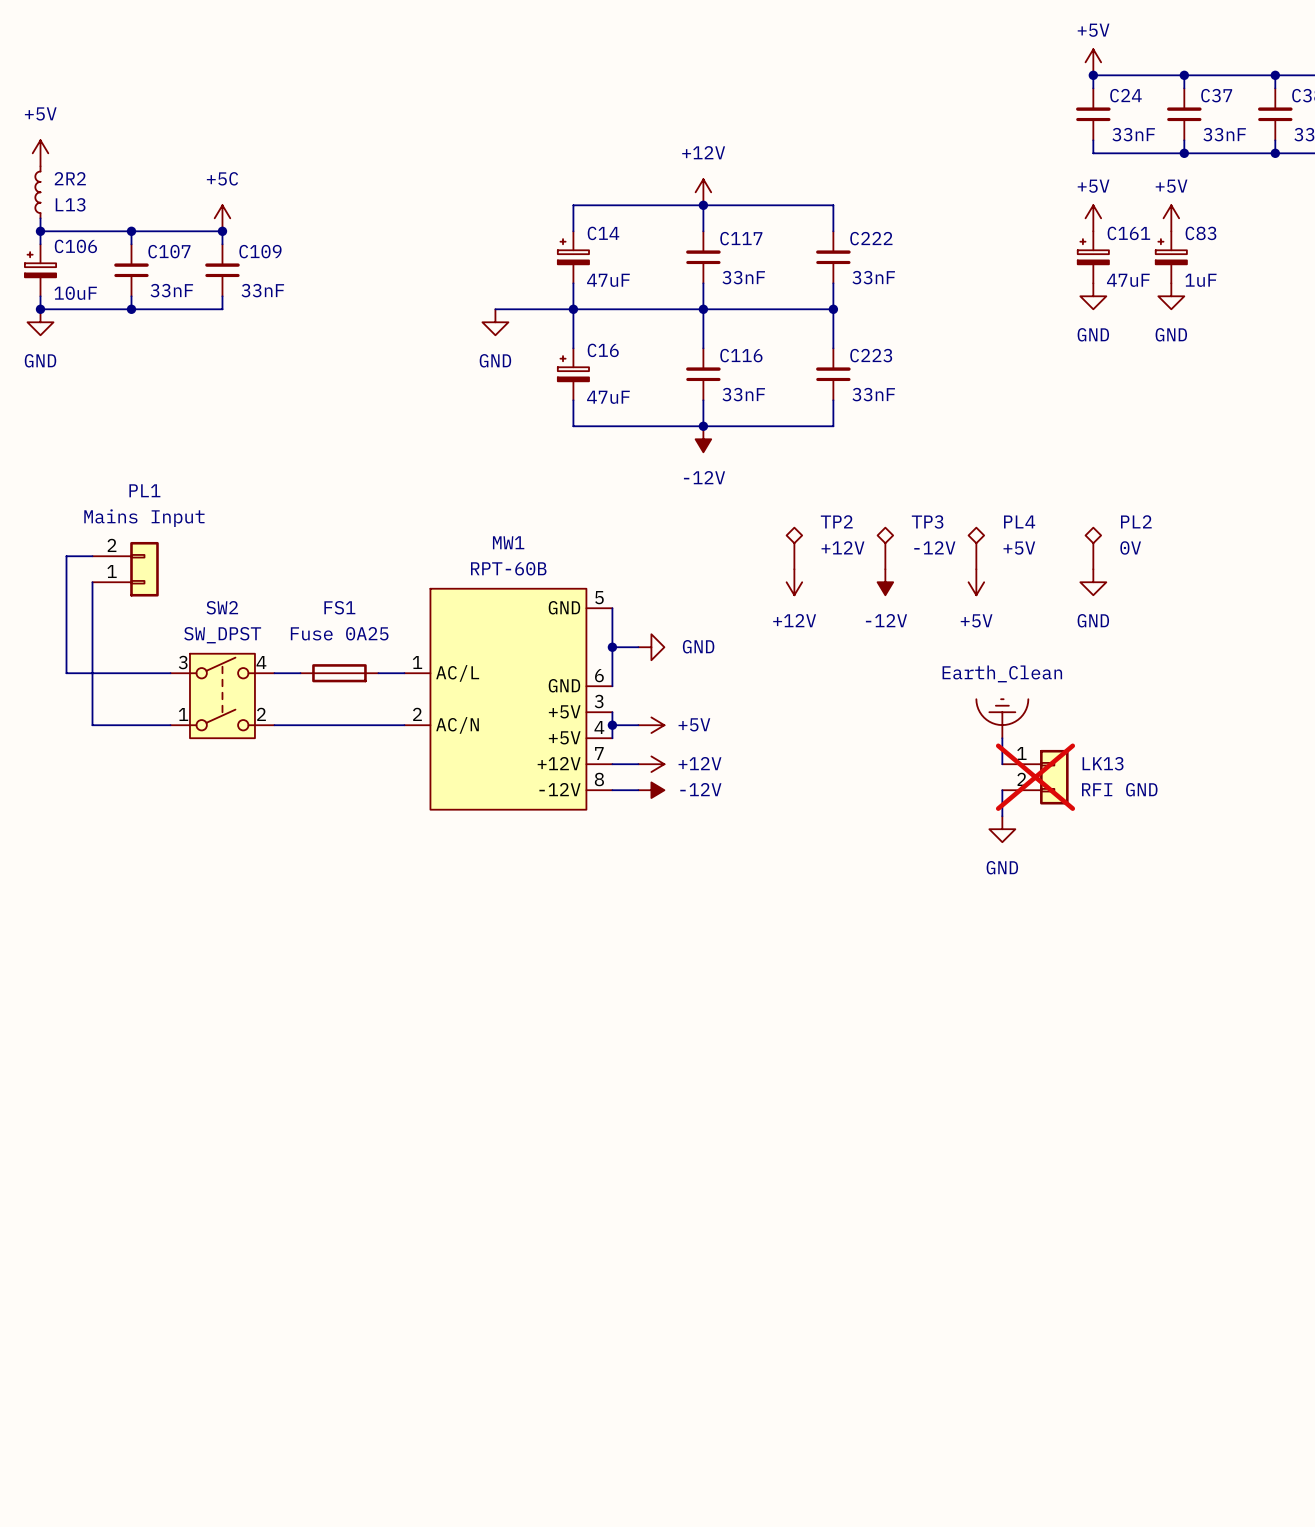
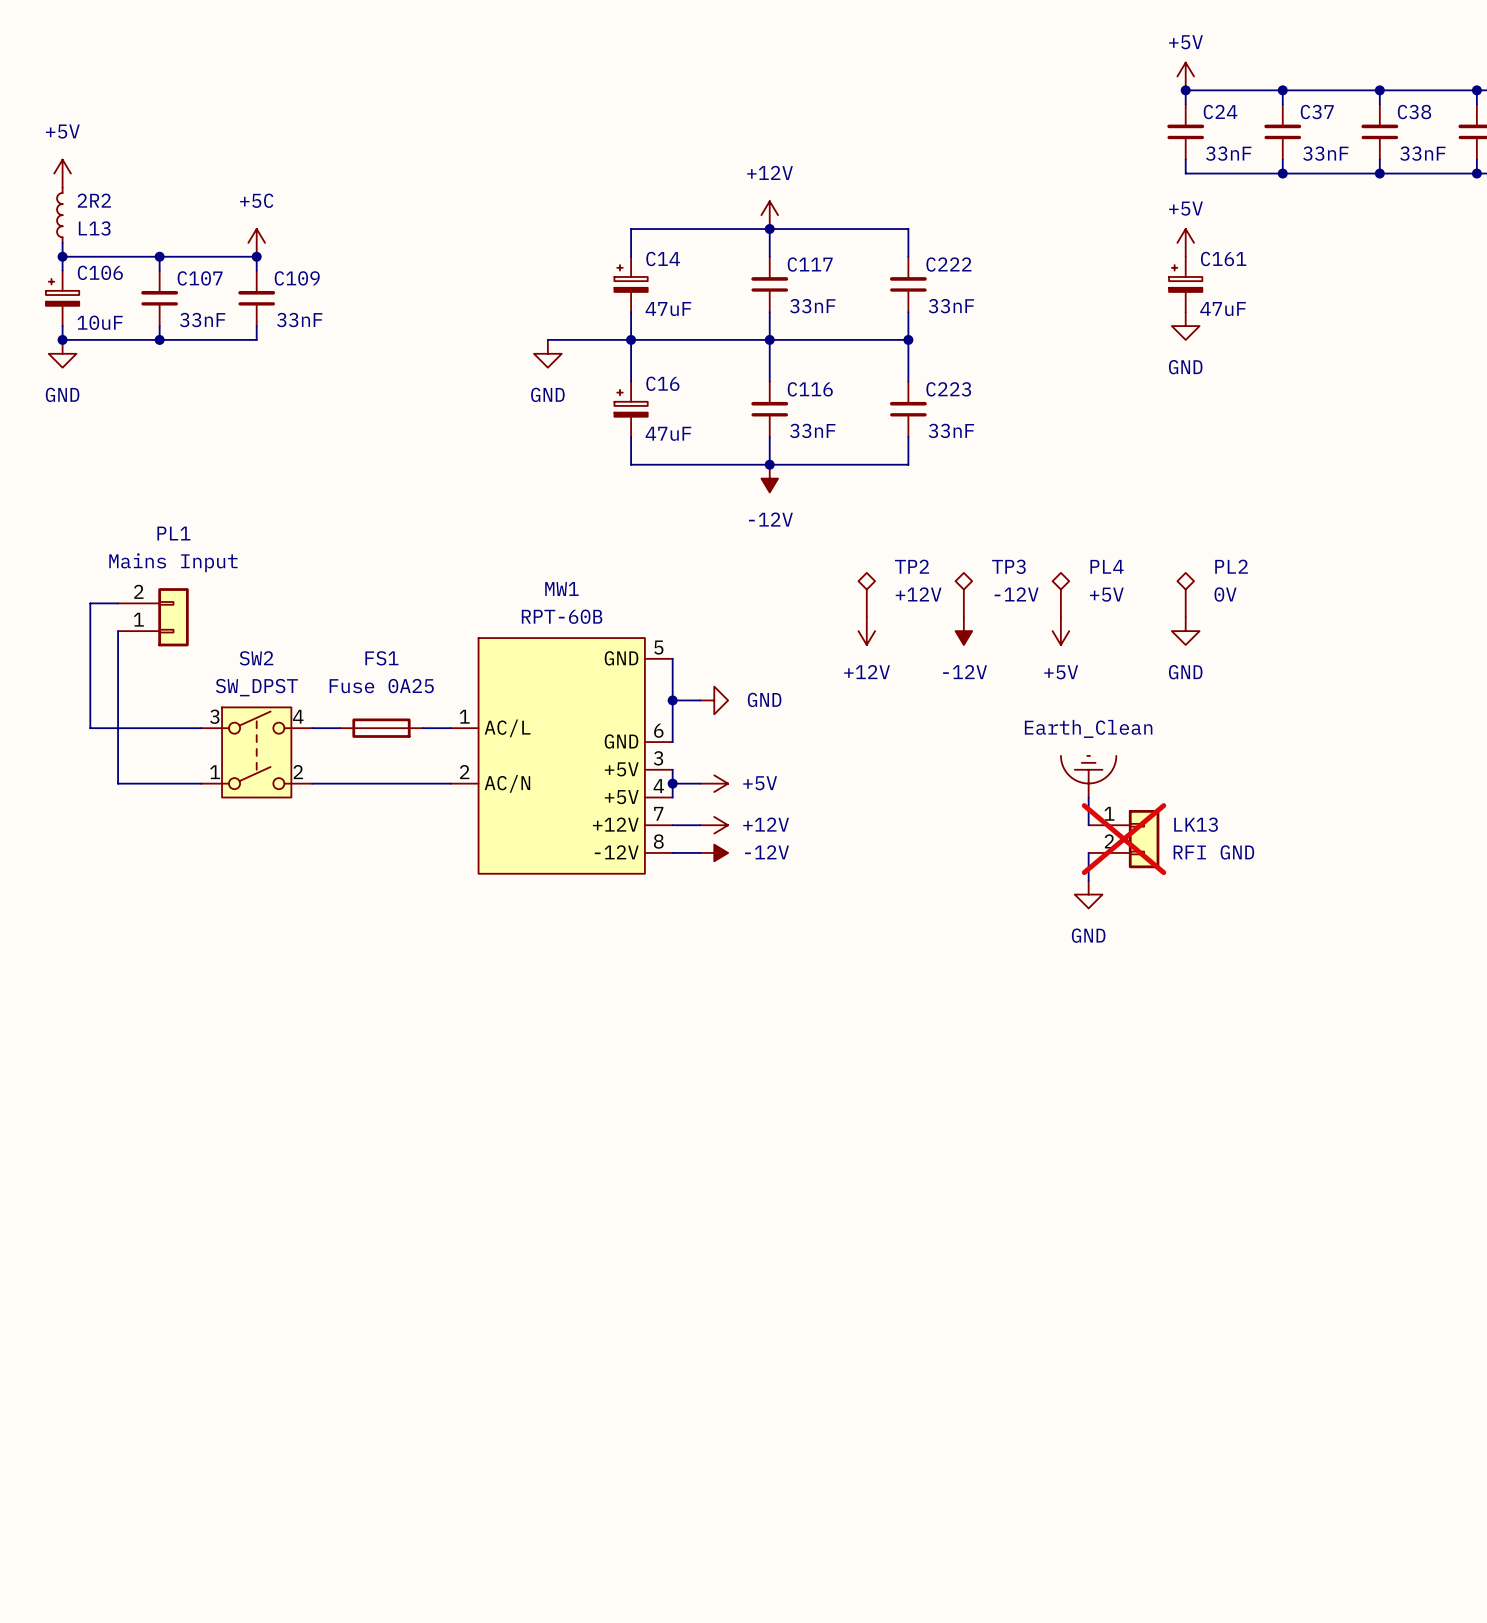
power symbol: +5V (1171, 218) -> none
C83: 1uF (1171, 257) -> none
power symbol: GND (1171, 296) -> none

